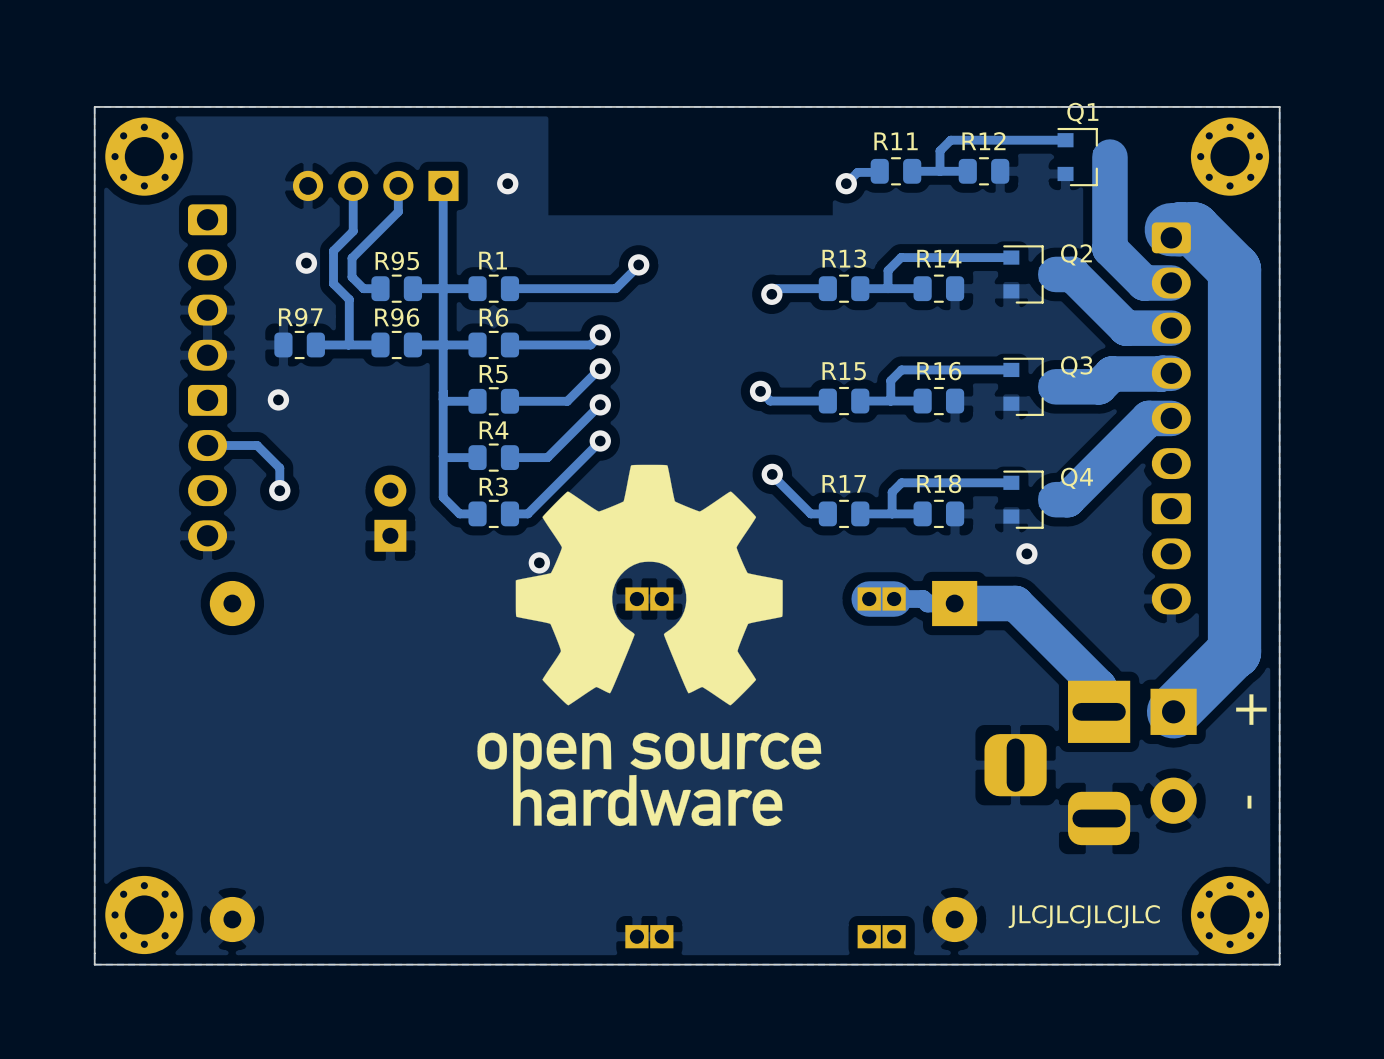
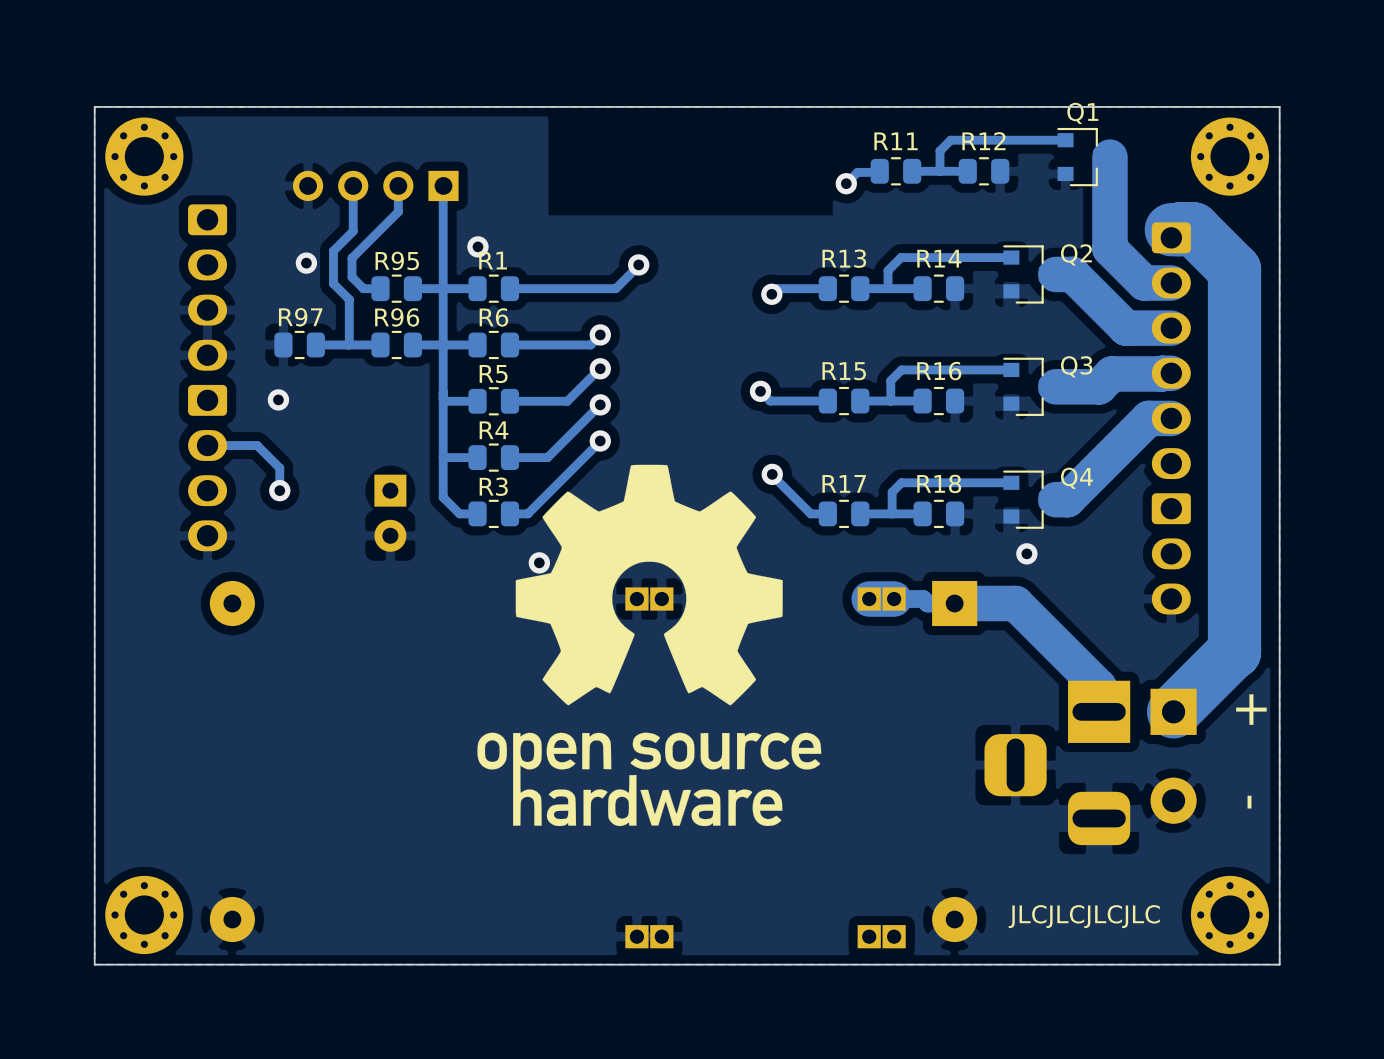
via position: (507, 183) -> (477, 246)
part rotation: 0° (390, 513) -> 180° (390, 513)

